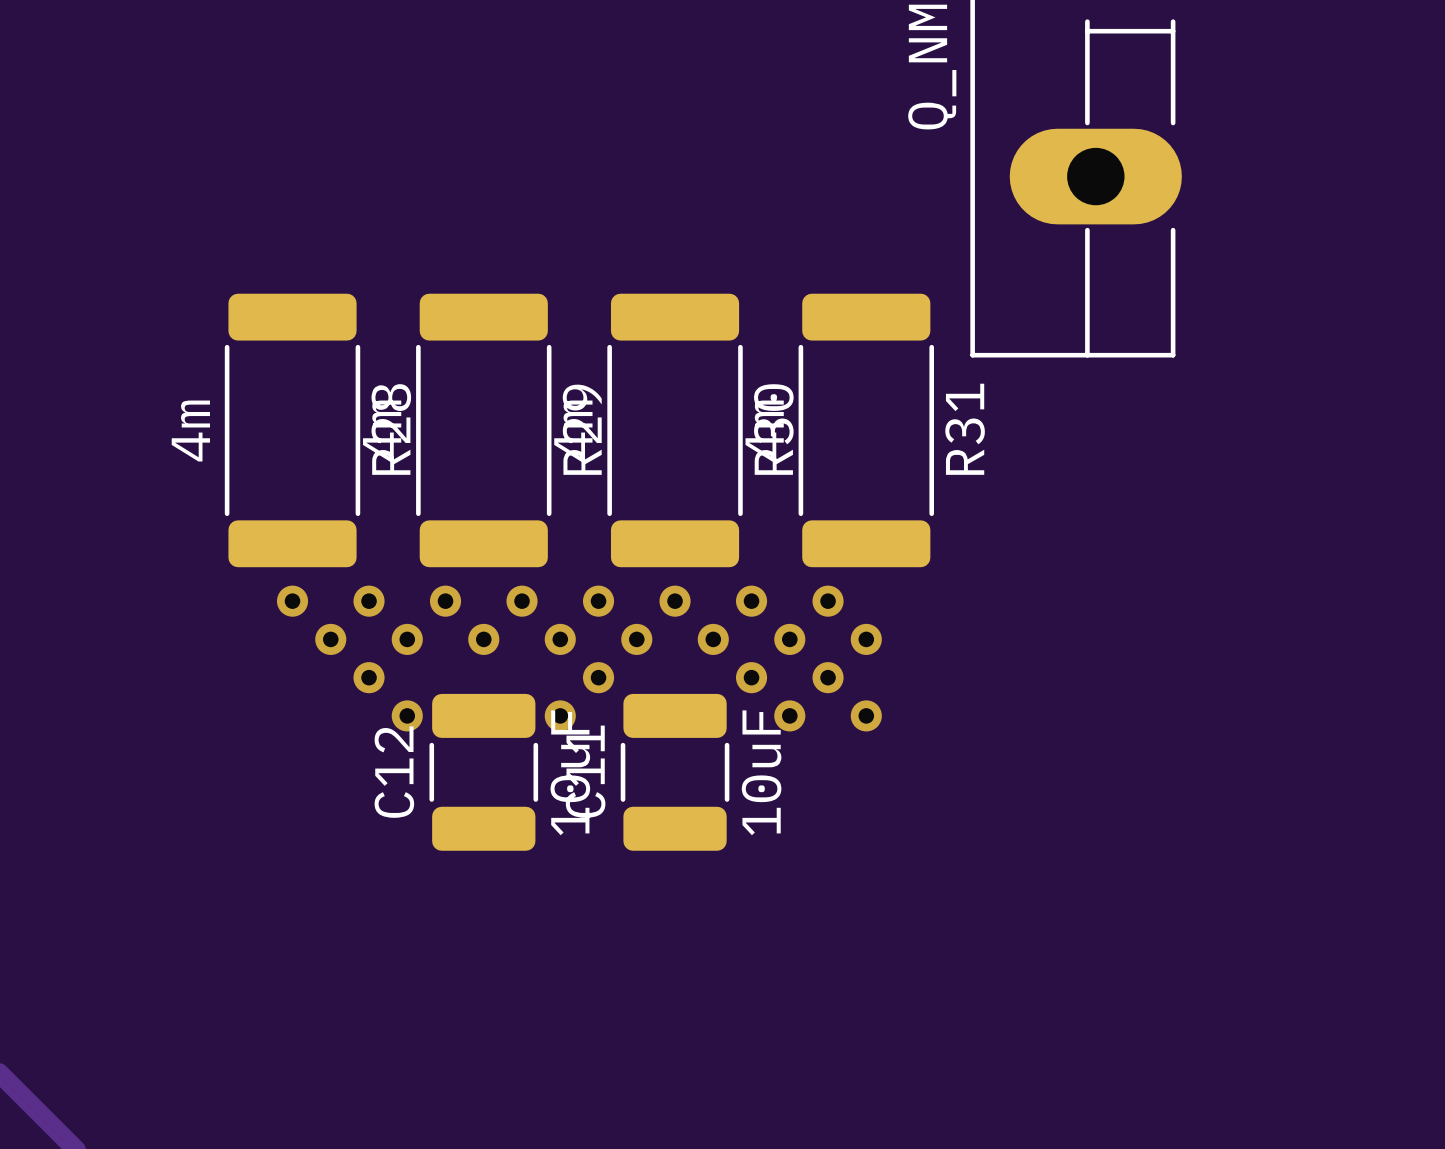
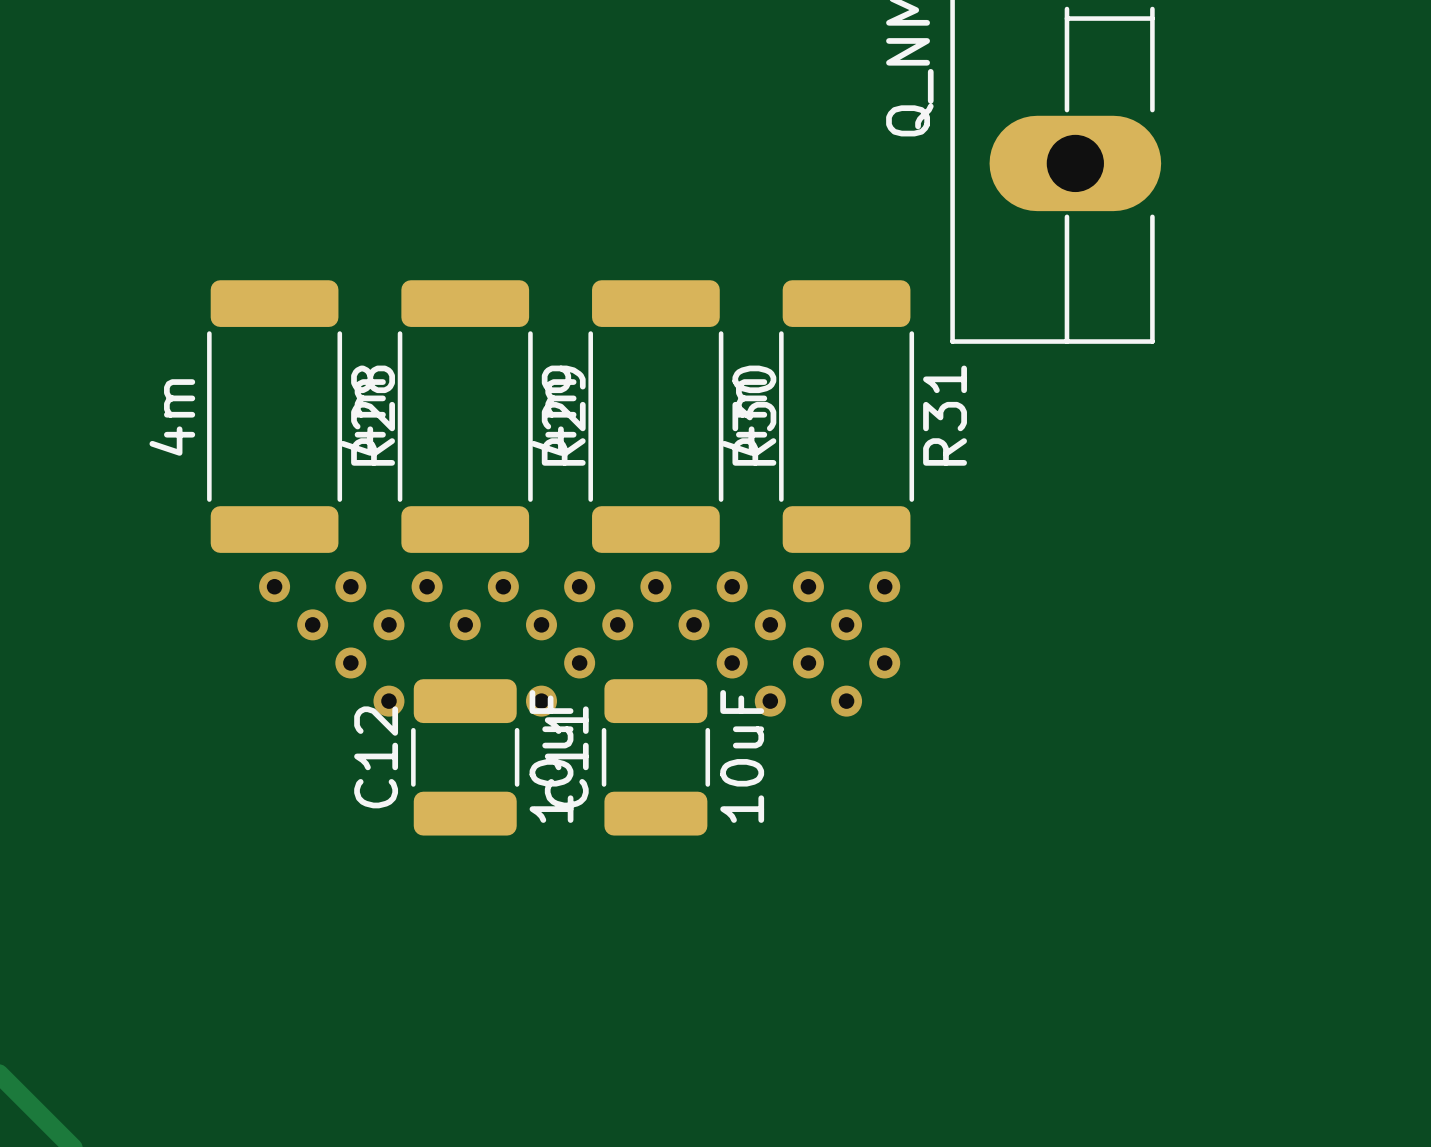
via: none -> (884, 586)
via: none -> (884, 662)

